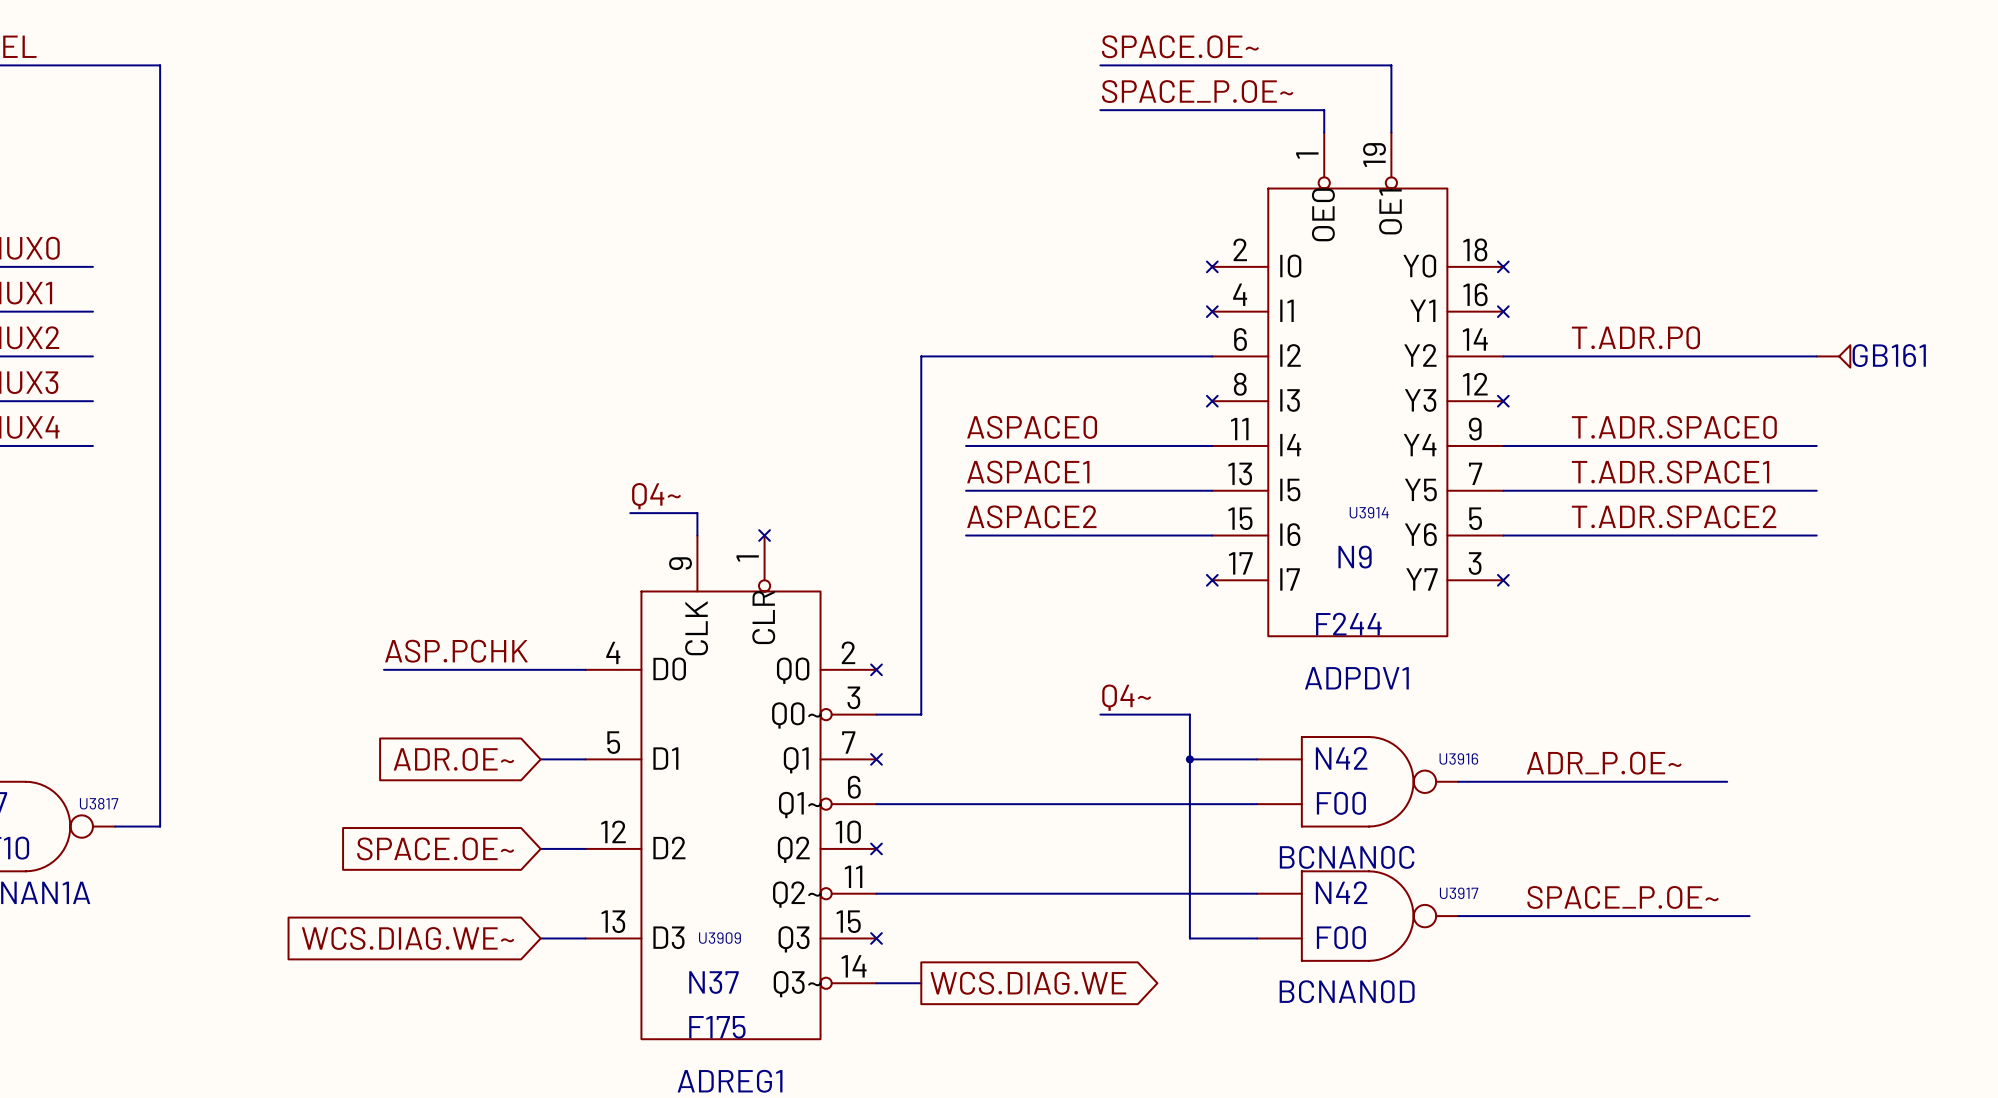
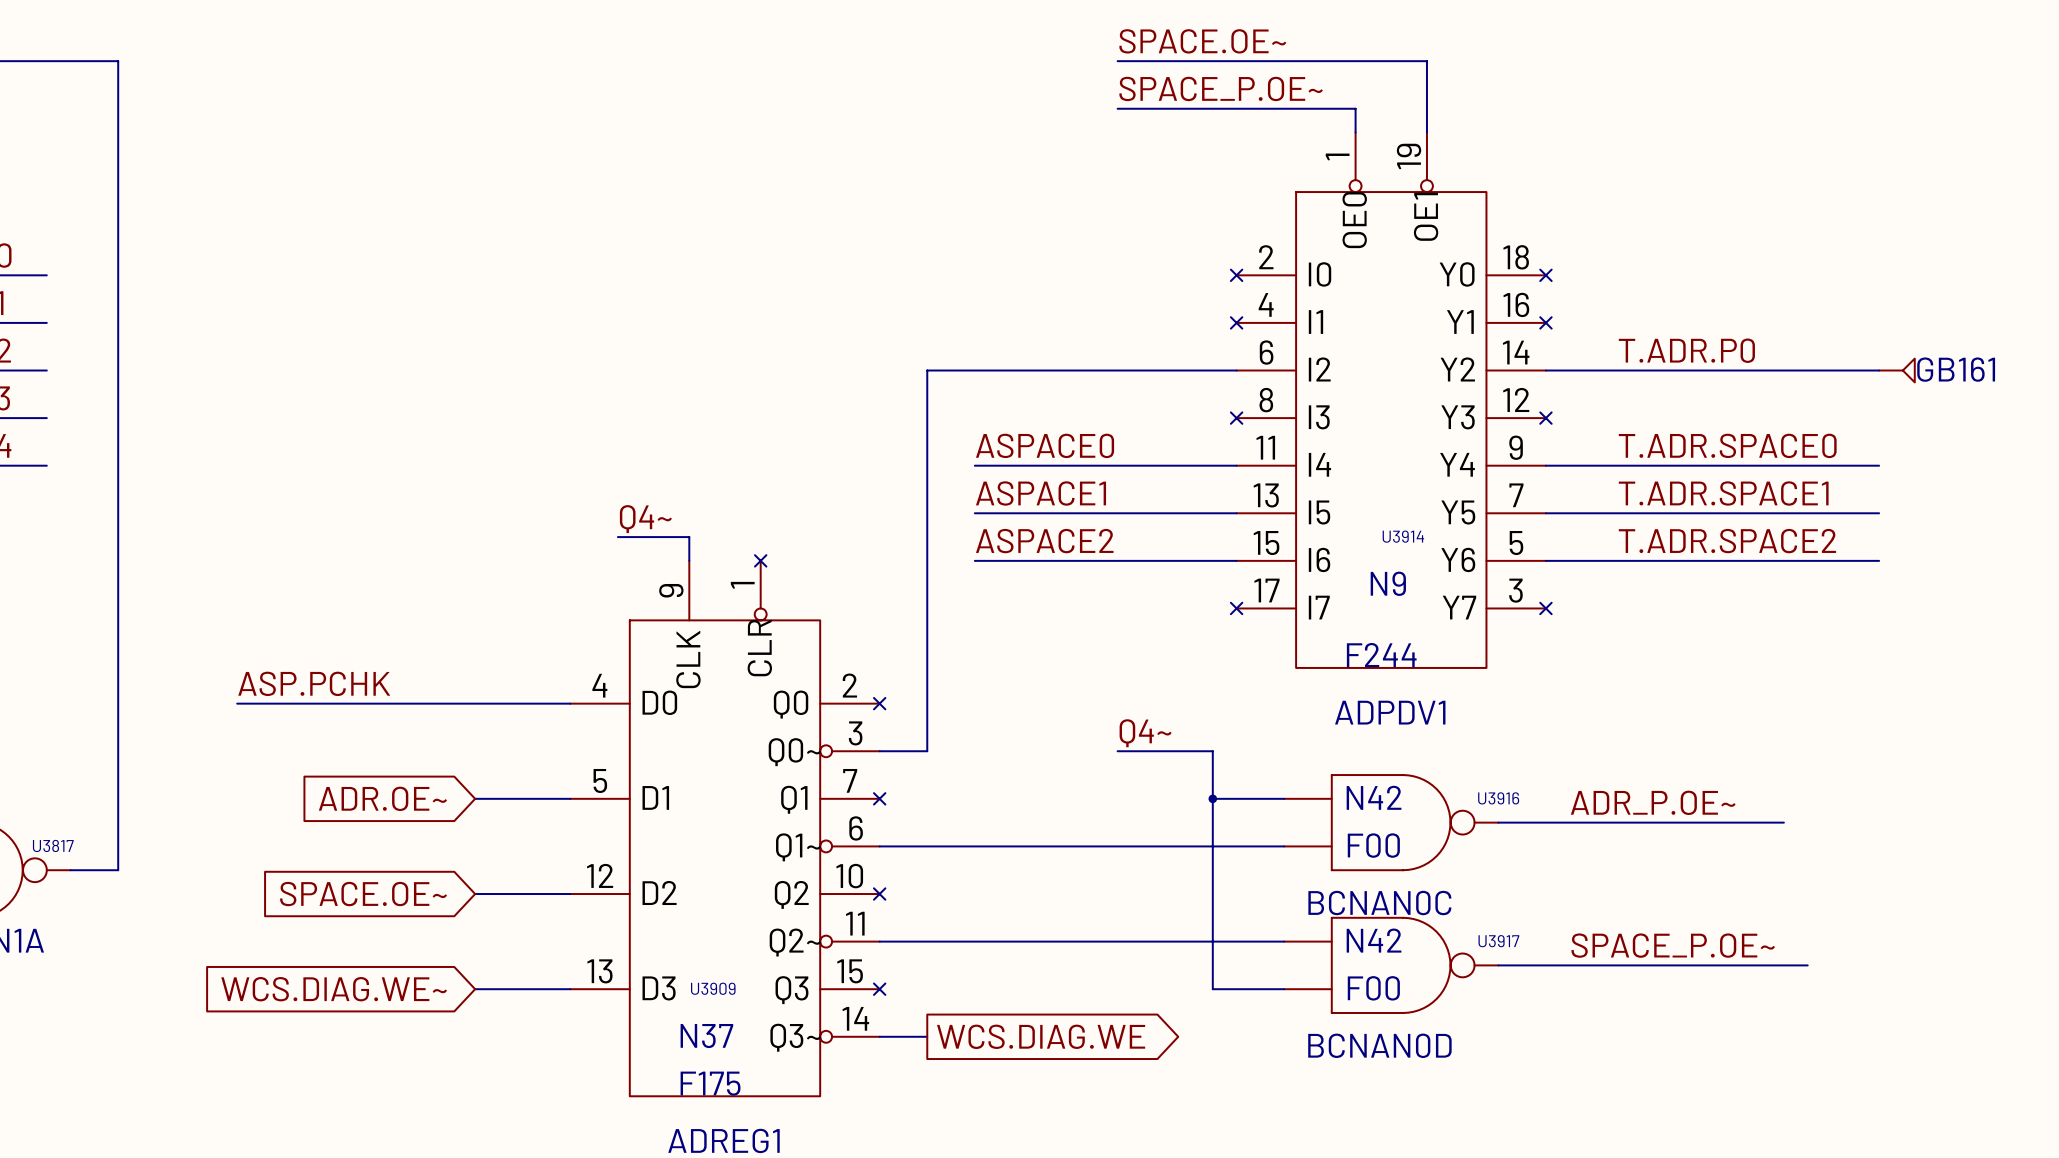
label position: ASP.PCHK (456, 651) -> ASP.PCHK (314, 683)
wire: none -> (237, 703) (356, 703)
global label position: ADR.OE~ (453, 759) -> ADR.OE~ (382, 798)
wire: none -> (475, 798) (522, 798)
global label position: SPACE.OE~ (435, 848) -> SPACE.OE~ (363, 894)
wire: none -> (475, 894) (522, 894)
global label position: WCS.DIAG.WE~ (408, 938) -> WCS.DIAG.WE~ (334, 989)
wire: none -> (475, 989) (522, 989)

